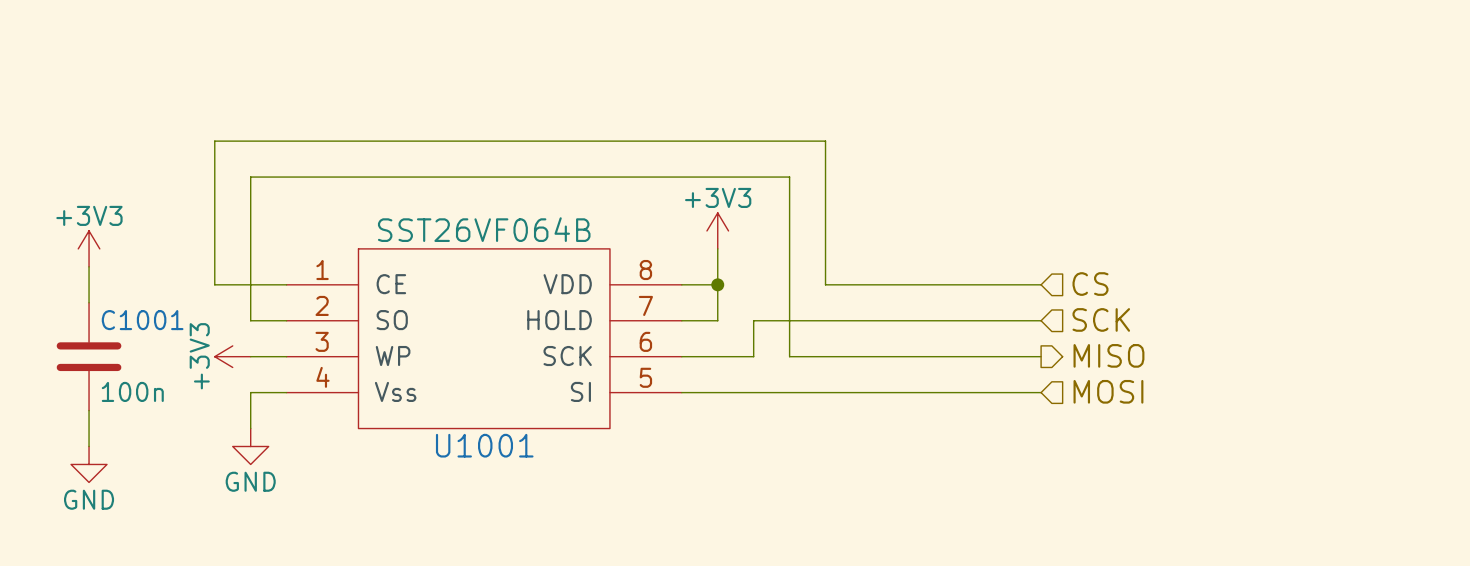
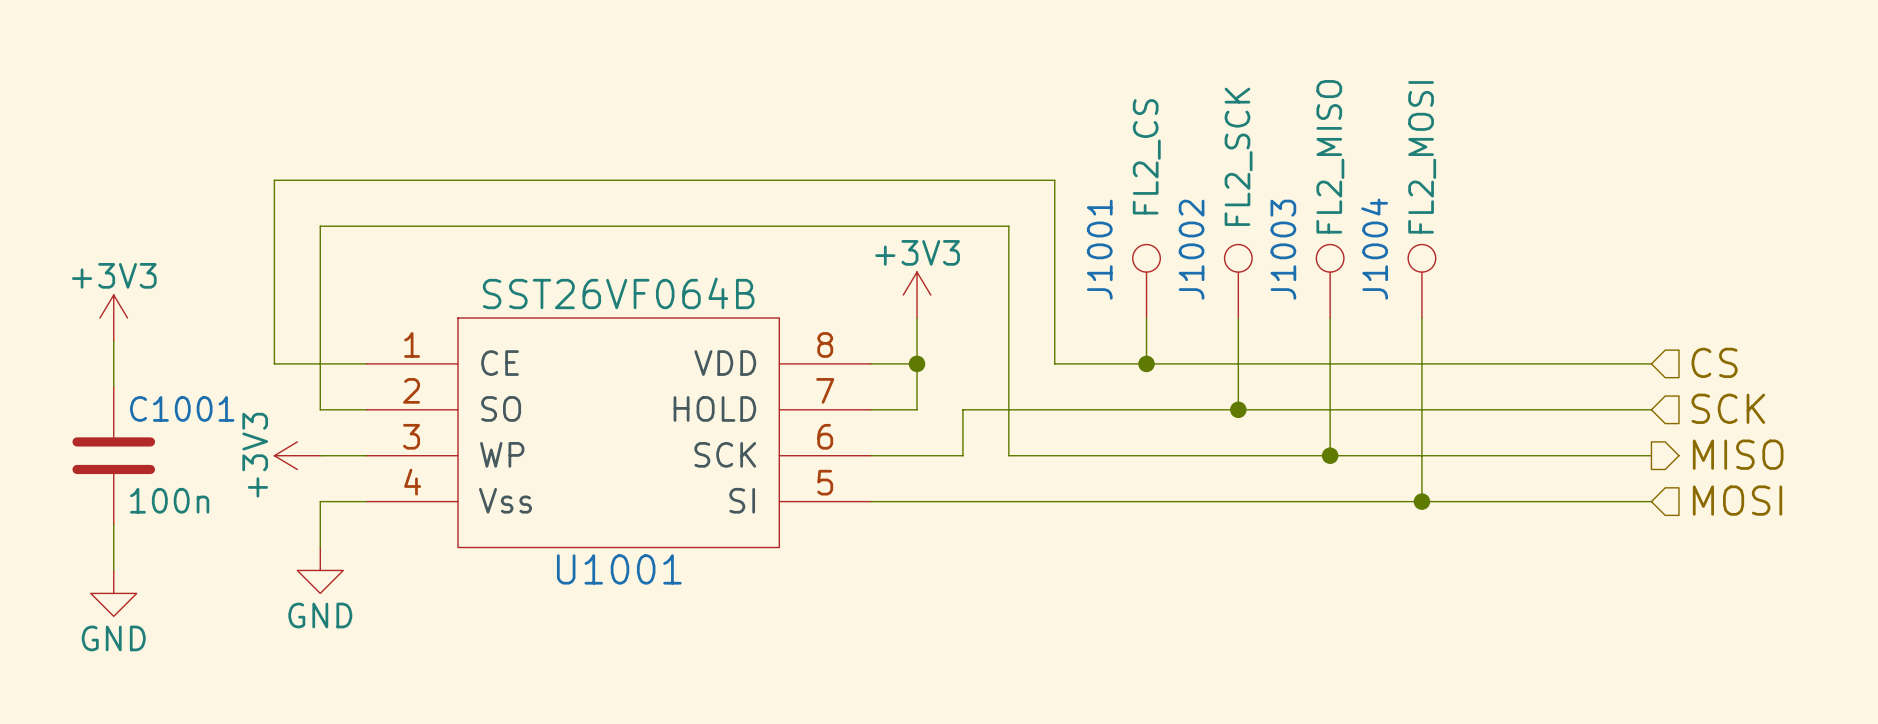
J1001: none -> FL2_CS (1146, 281)
J1002: none -> FL2_SCK (1238, 281)
J1003: none -> FL2_MISO (1330, 281)
J1004: none -> FL2_MOSI (1421, 281)
wire: none -> (1146, 318) (1146, 363)
wire: none -> (1238, 318) (1238, 409)
wire: none -> (1330, 318) (1330, 455) (1651, 455)
wire: none -> (1421, 318) (1421, 501)
junction: none -> (1146, 363)
wire: none -> (1330, 363) (1651, 363)
hierarchical label position: CS (1090, 284) -> CS (1714, 362)
hierarchical label position: SCK (1101, 319) -> SCK (1728, 408)
junction: none -> (1238, 409)
wire: none -> (1330, 409) (1651, 409)
hierarchical label position: MISO (1108, 355) -> MISO (1738, 454)
junction: none -> (1330, 455)
hierarchical label position: MOSI (1108, 391) -> MOSI (1737, 500)
wire: none -> (1330, 501) (1651, 501)
junction: none -> (1421, 501)

